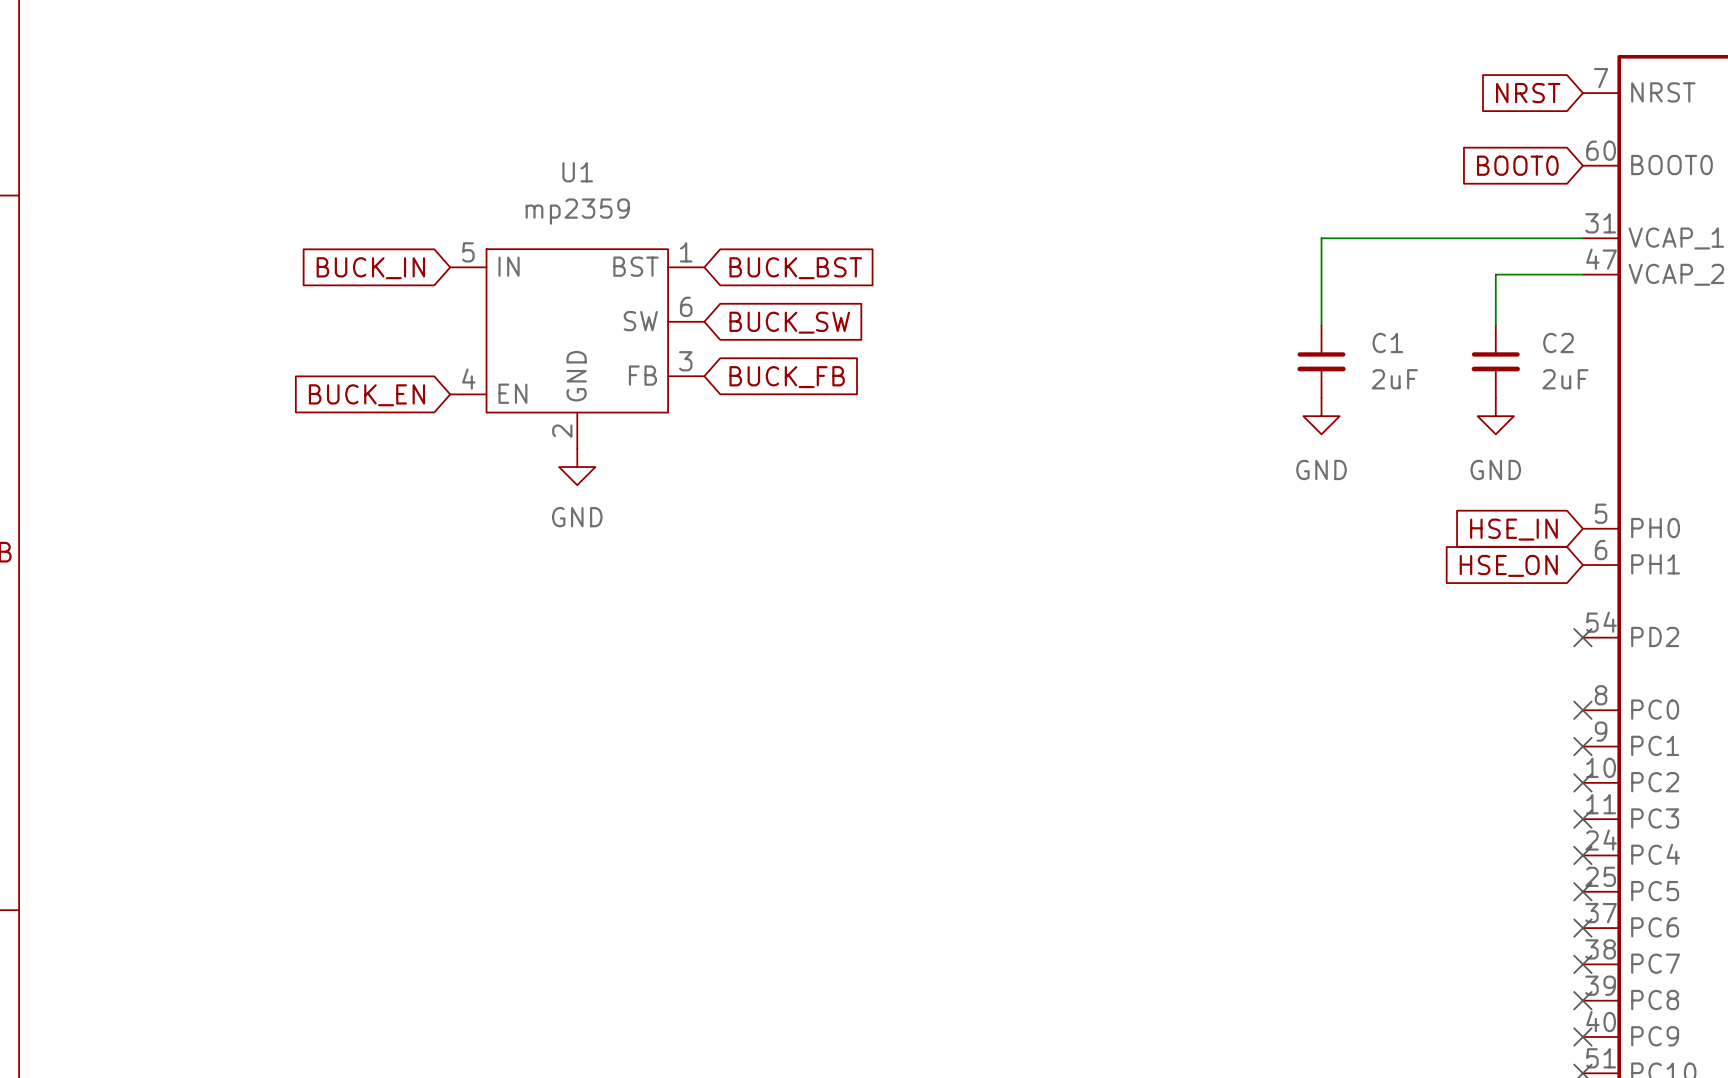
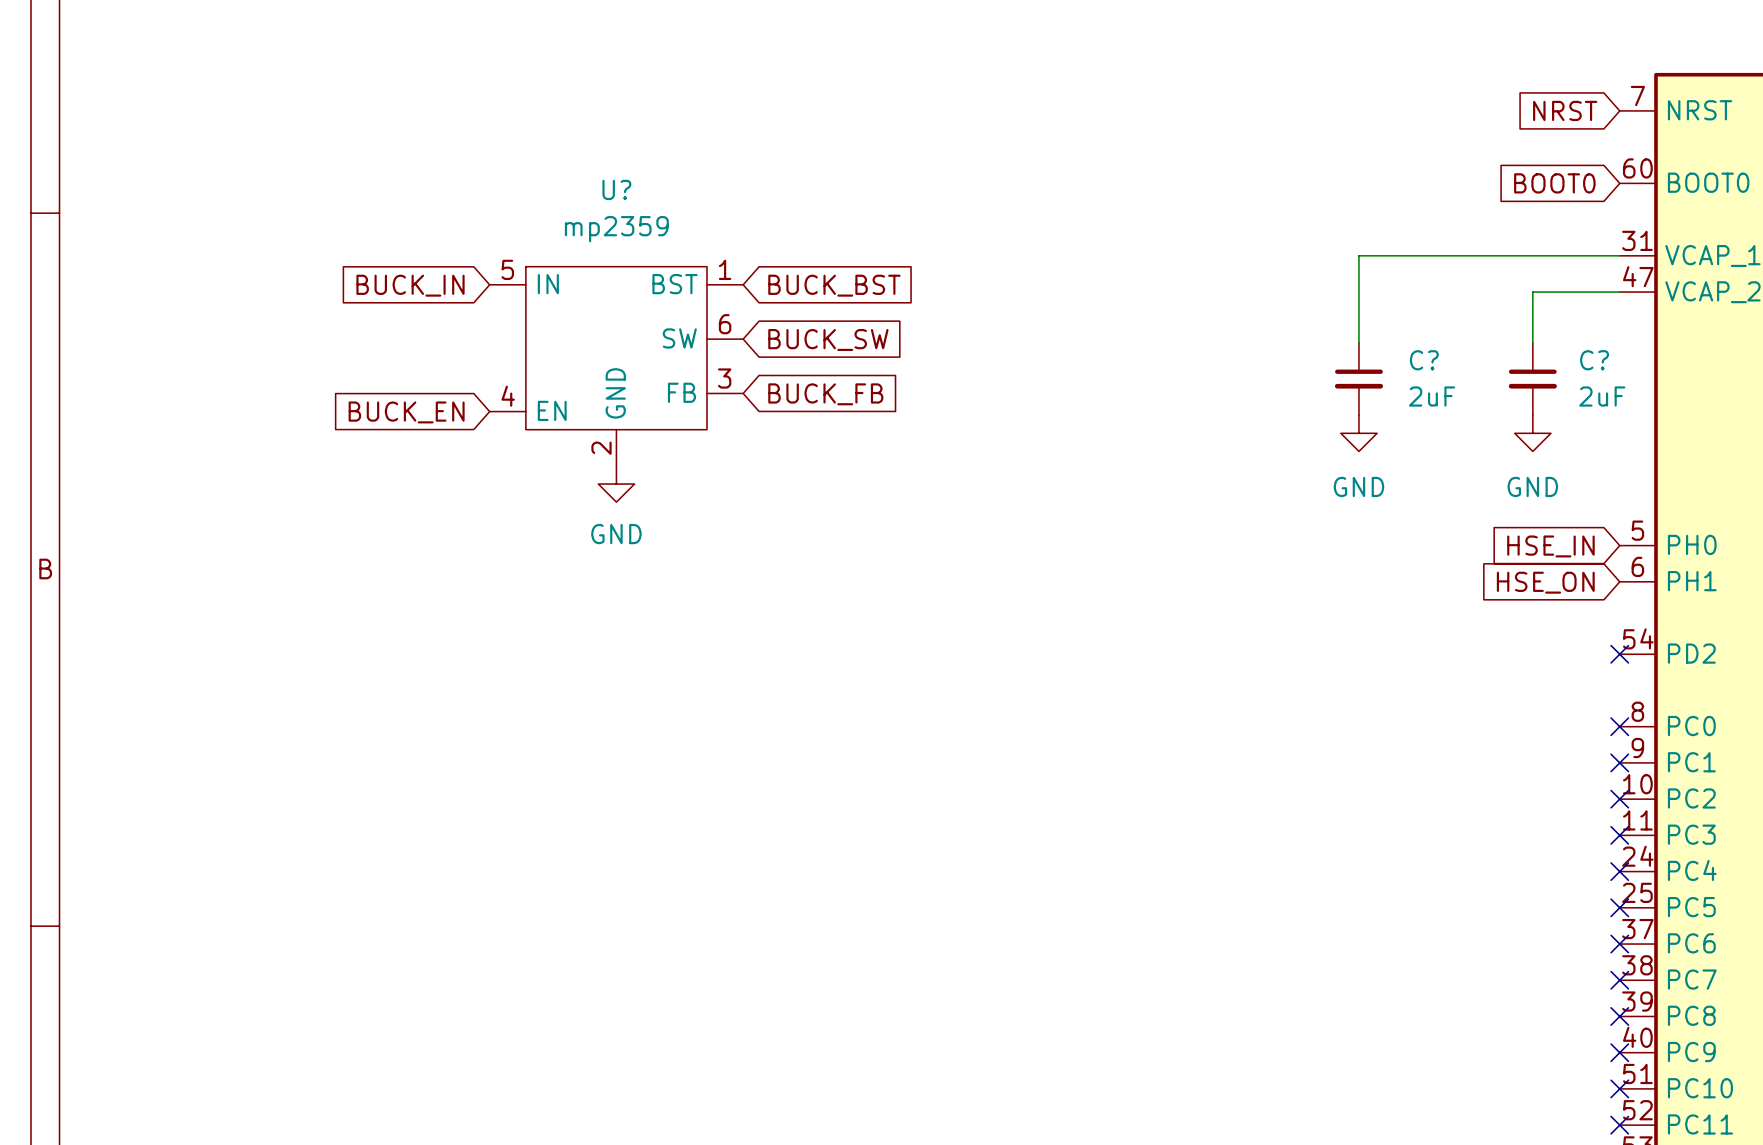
U1 name: U1 (577, 172) -> U? (616, 189)
C1 name: C1 (1387, 342) -> C? (1424, 360)
C2 name: C2 (1558, 342) -> C? (1594, 360)

